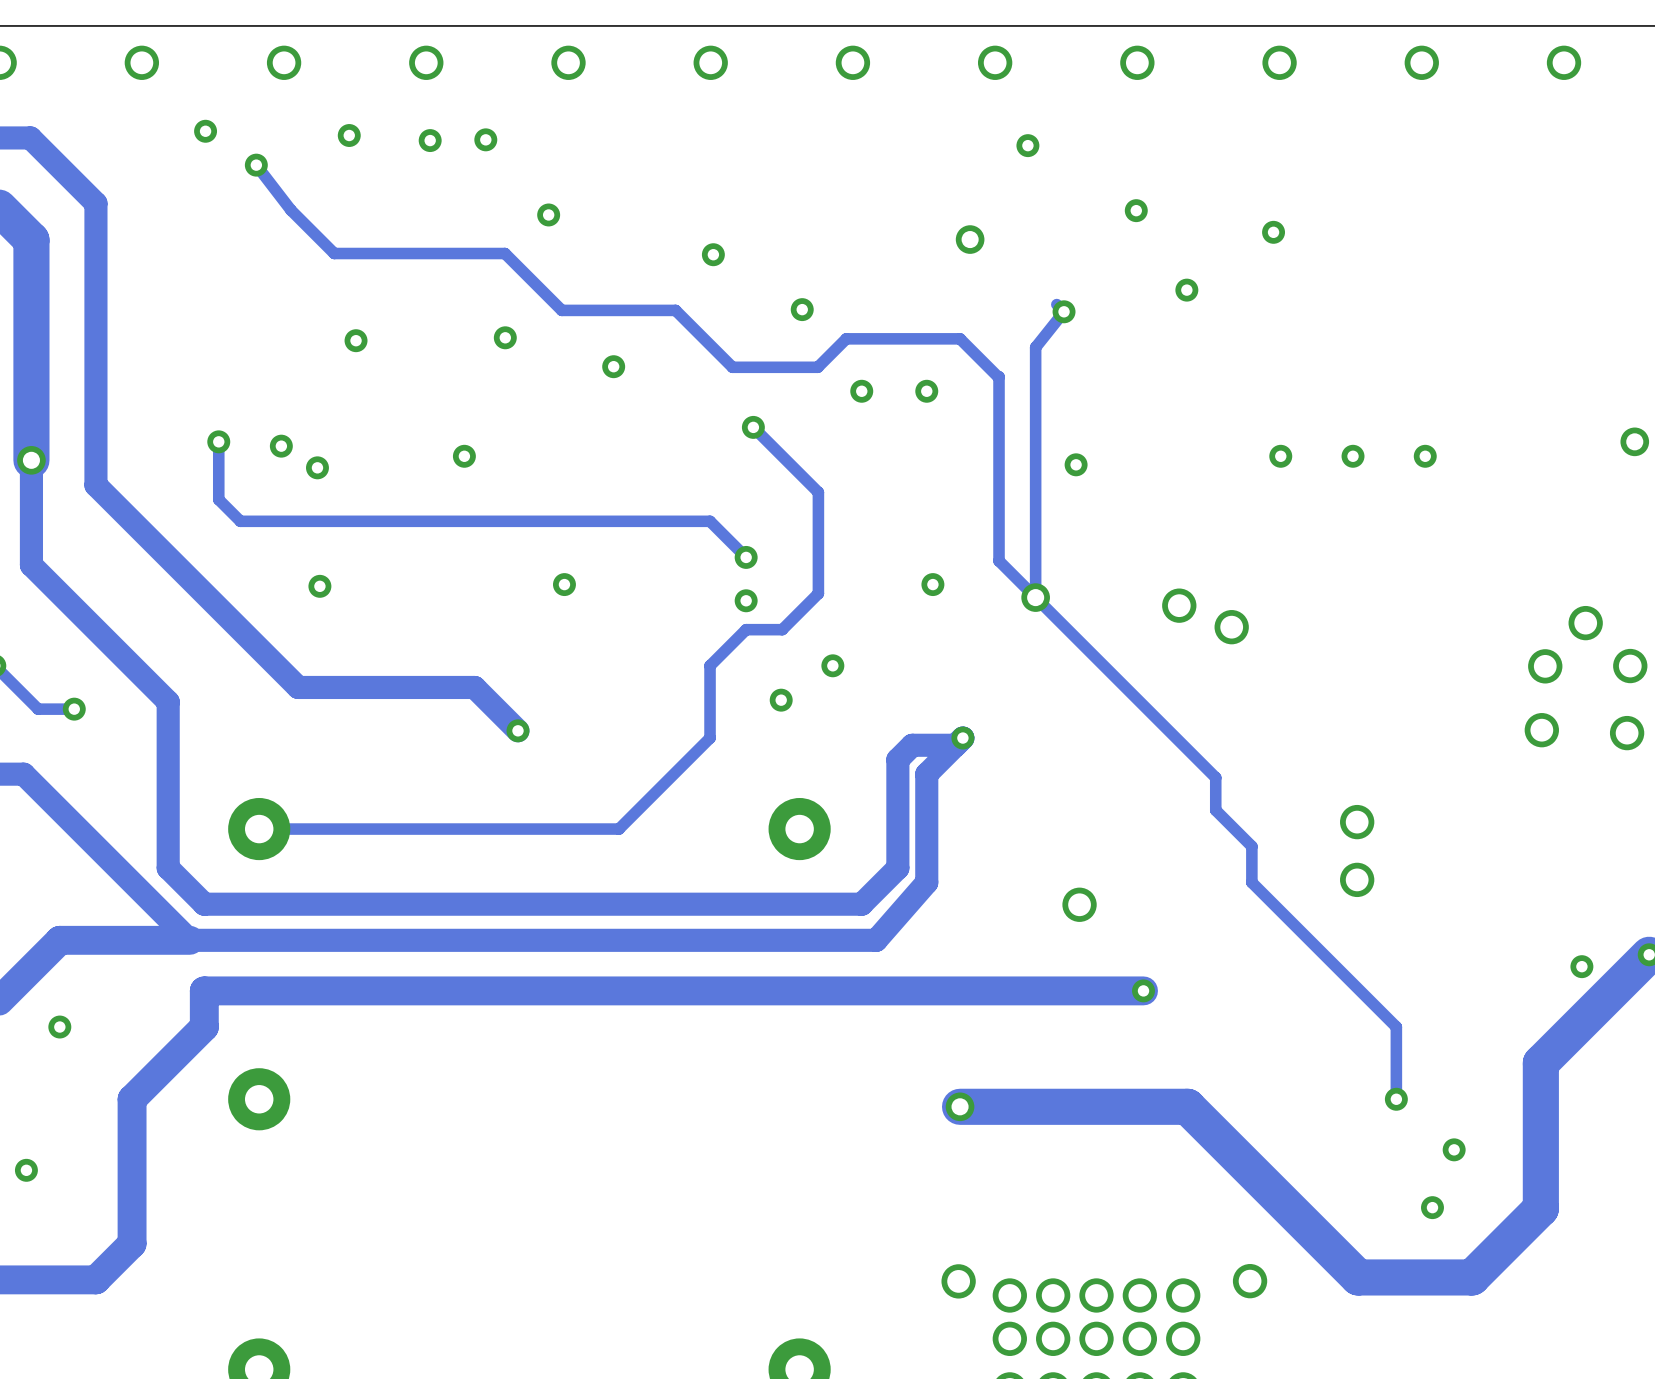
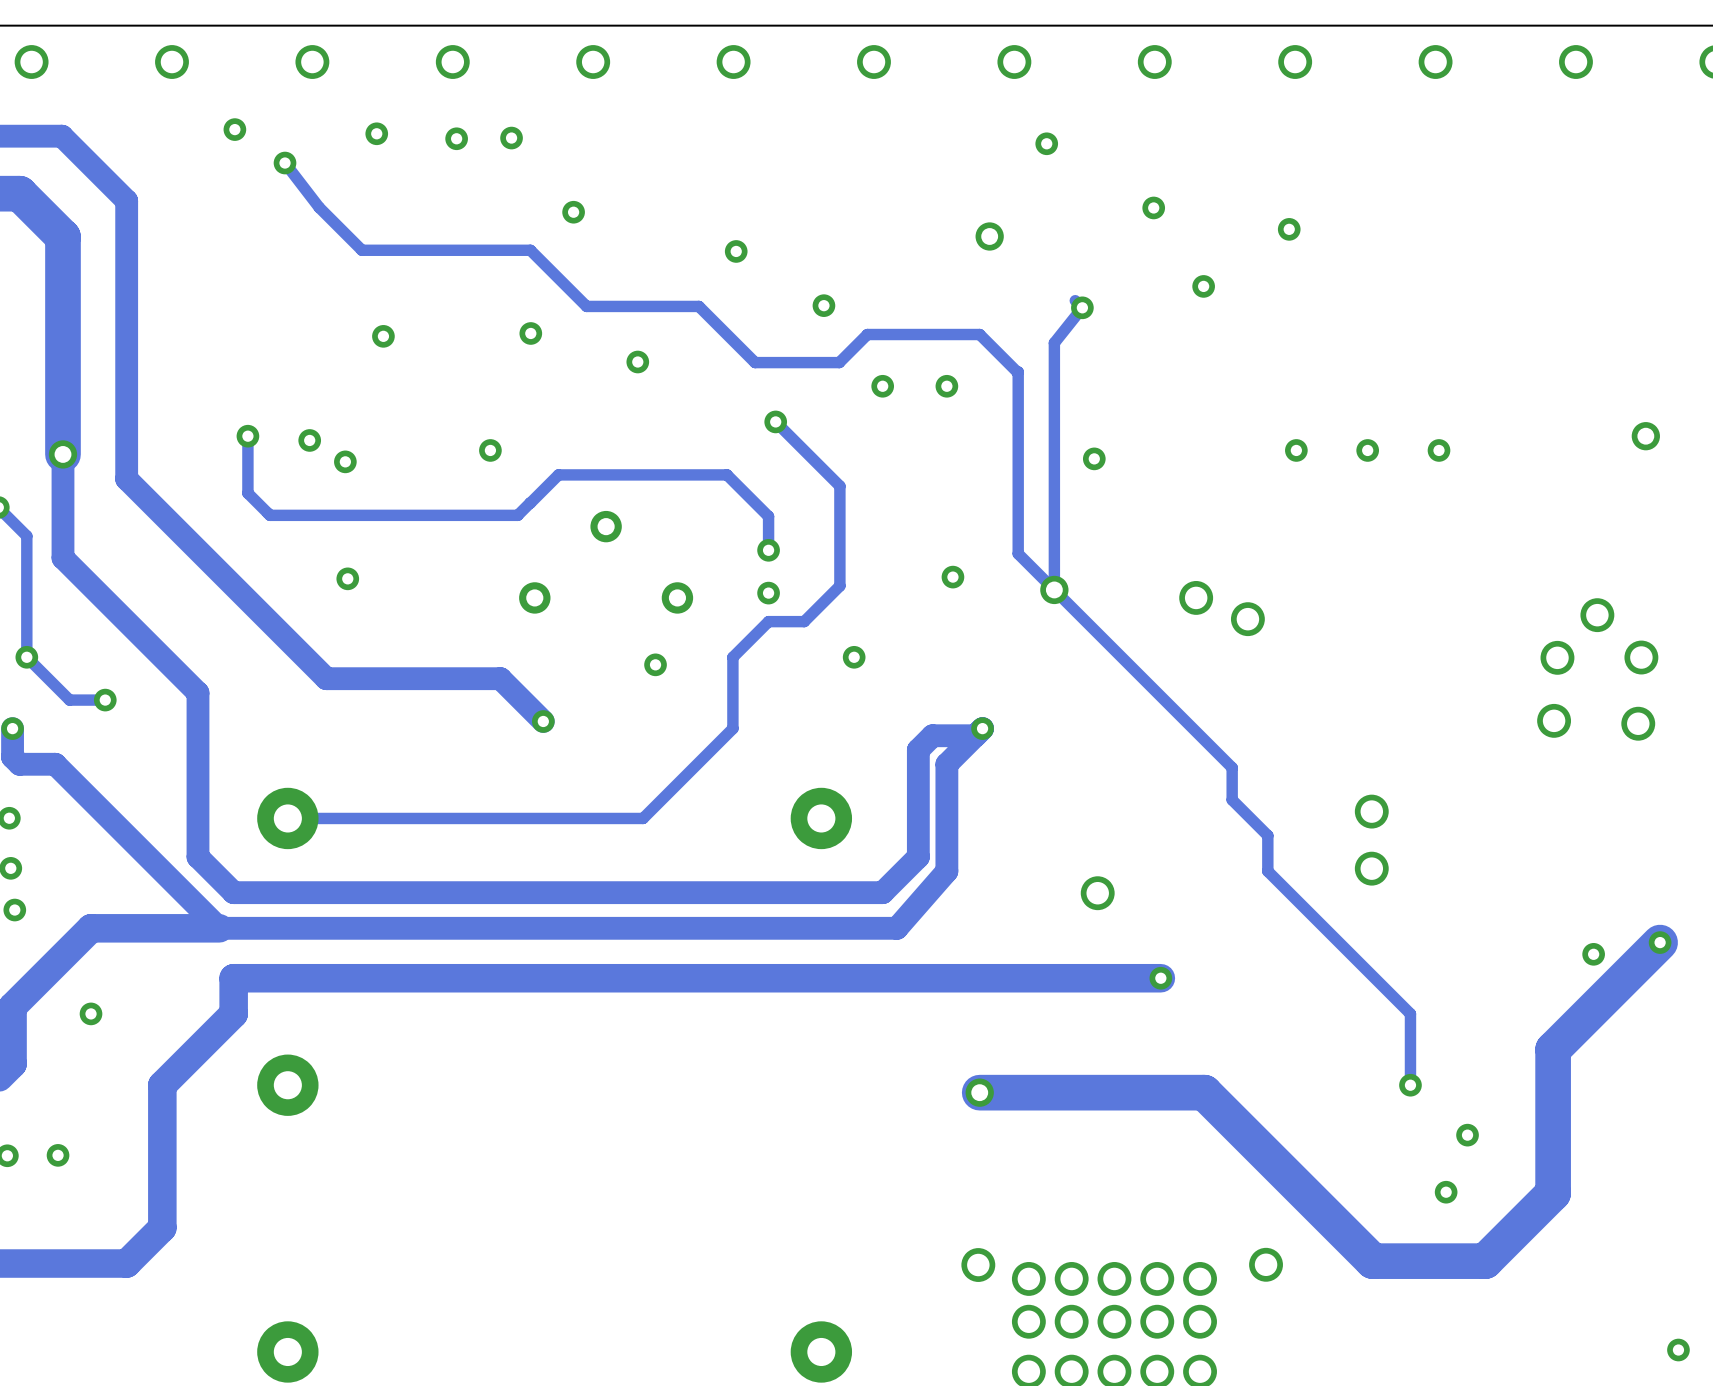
track: (240, 521) (710, 521) (746, 557) -> (269, 514) (517, 515) (558, 474) (727, 474) (768, 516) (768, 550)
part: none -> (606, 562)
via: (564, 584) -> none
via: none -> (655, 664)
via: (781, 700) -> none

